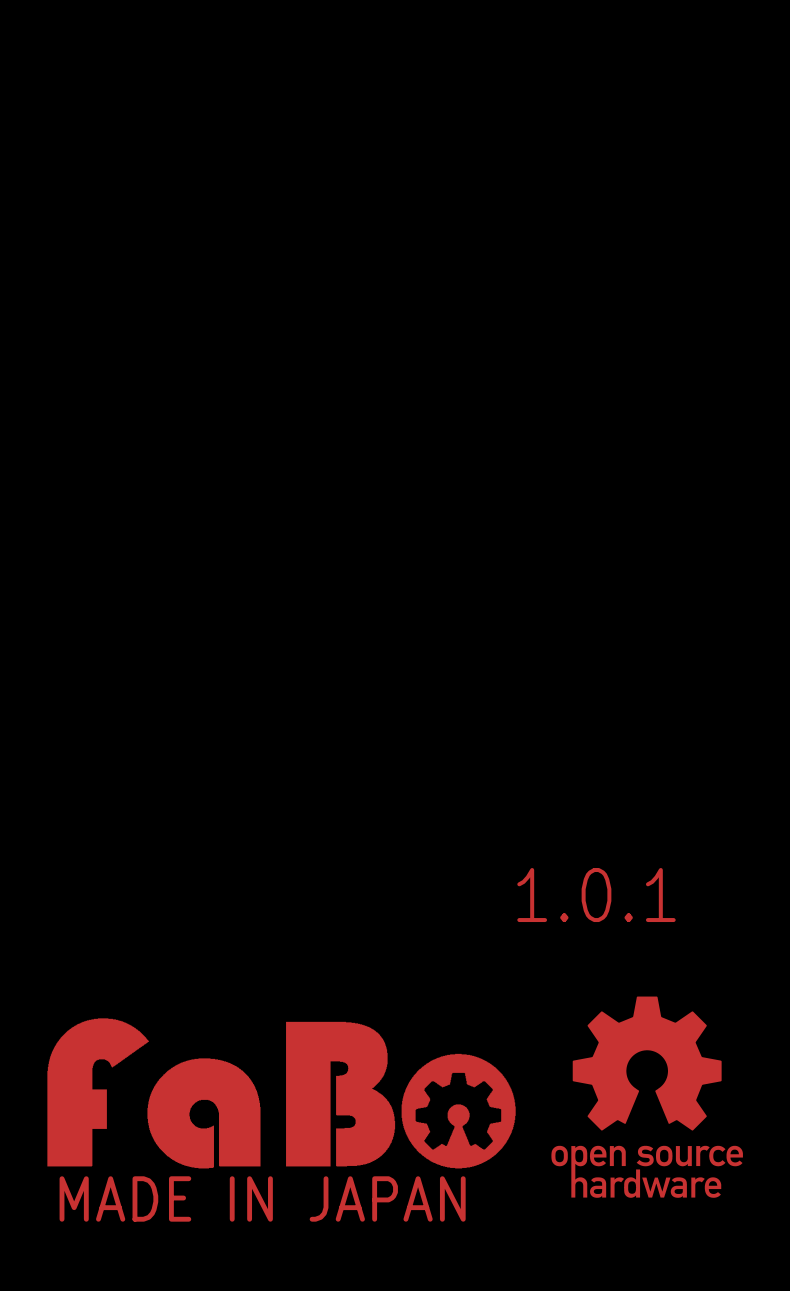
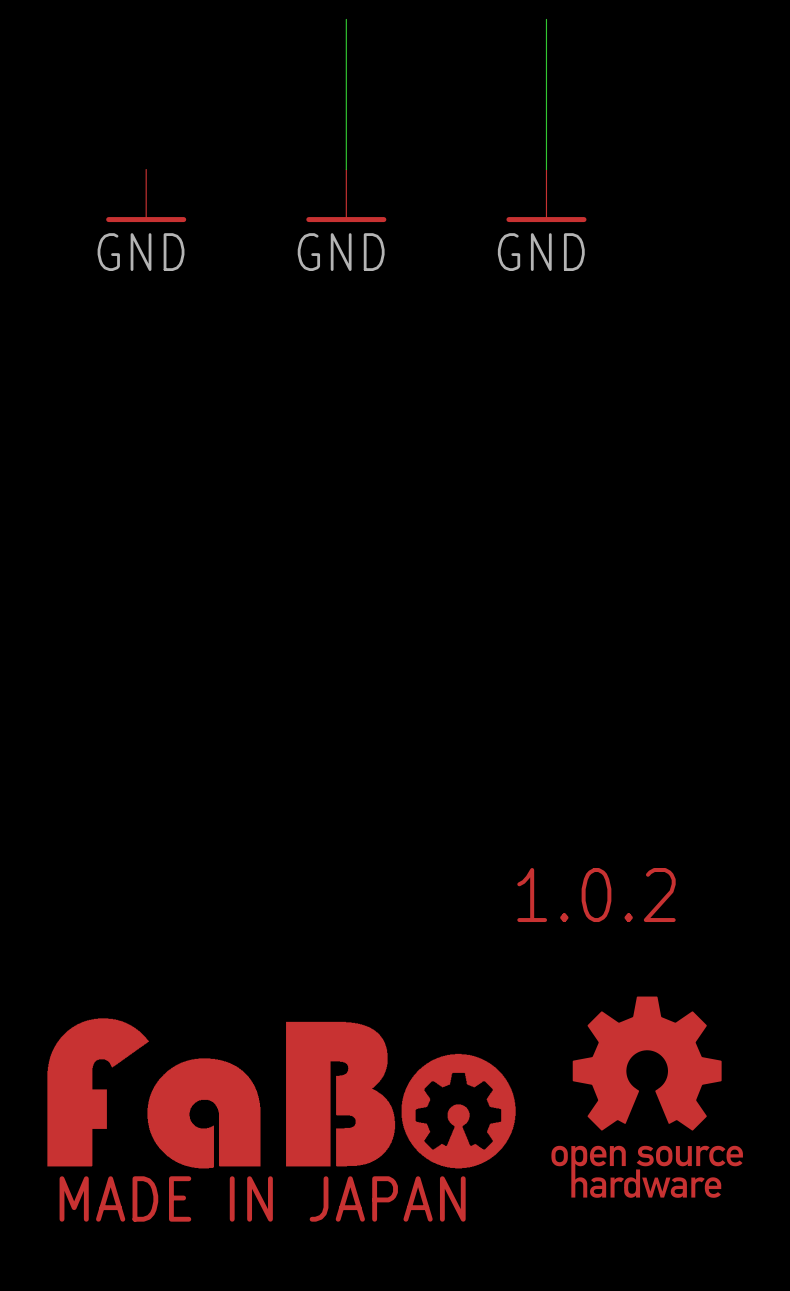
wire: none -> (346, 19) (346, 169)
wire: none -> (546, 19) (546, 169)
power symbol: none -> GND (146, 195)
power symbol: none -> GND (346, 195)
power symbol: none -> GND (546, 195)
text: 1.0.1 (596, 895) -> 1.0.2 (596, 895)

